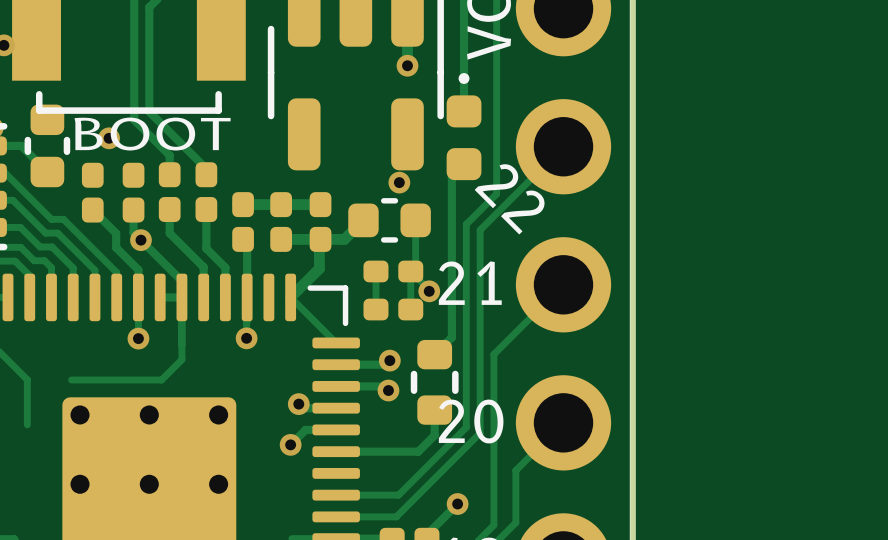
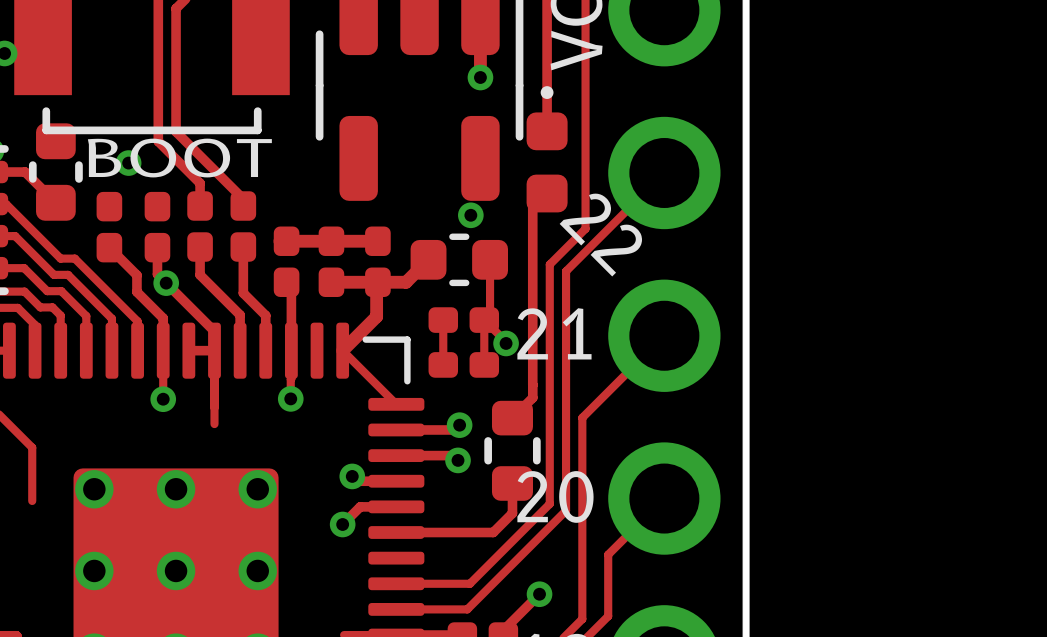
track: (181, 359) (161, 380) (71, 380) -> none

